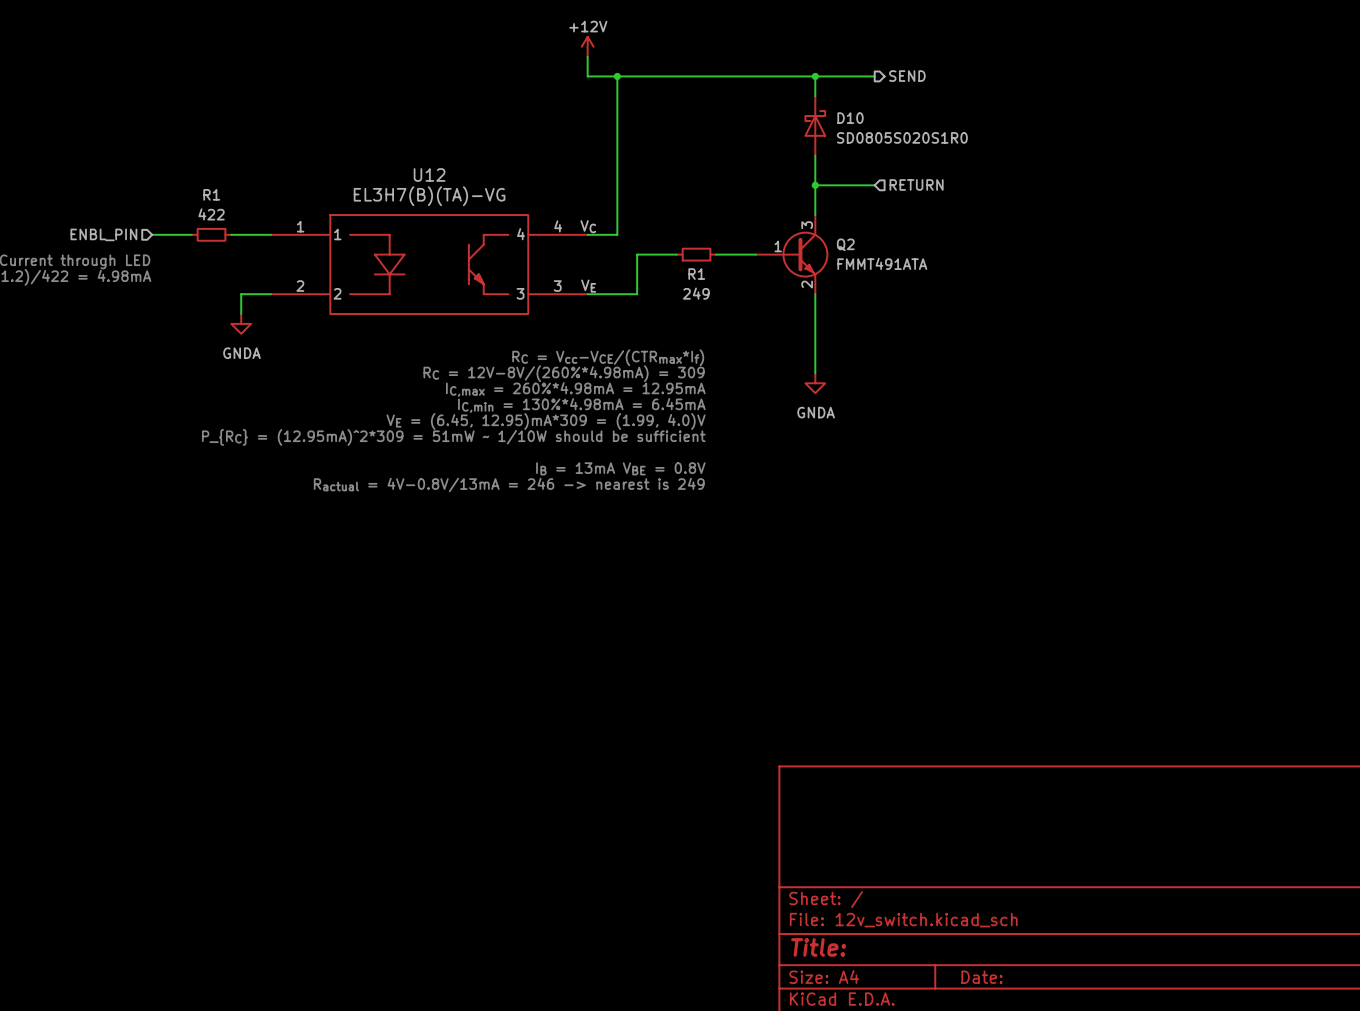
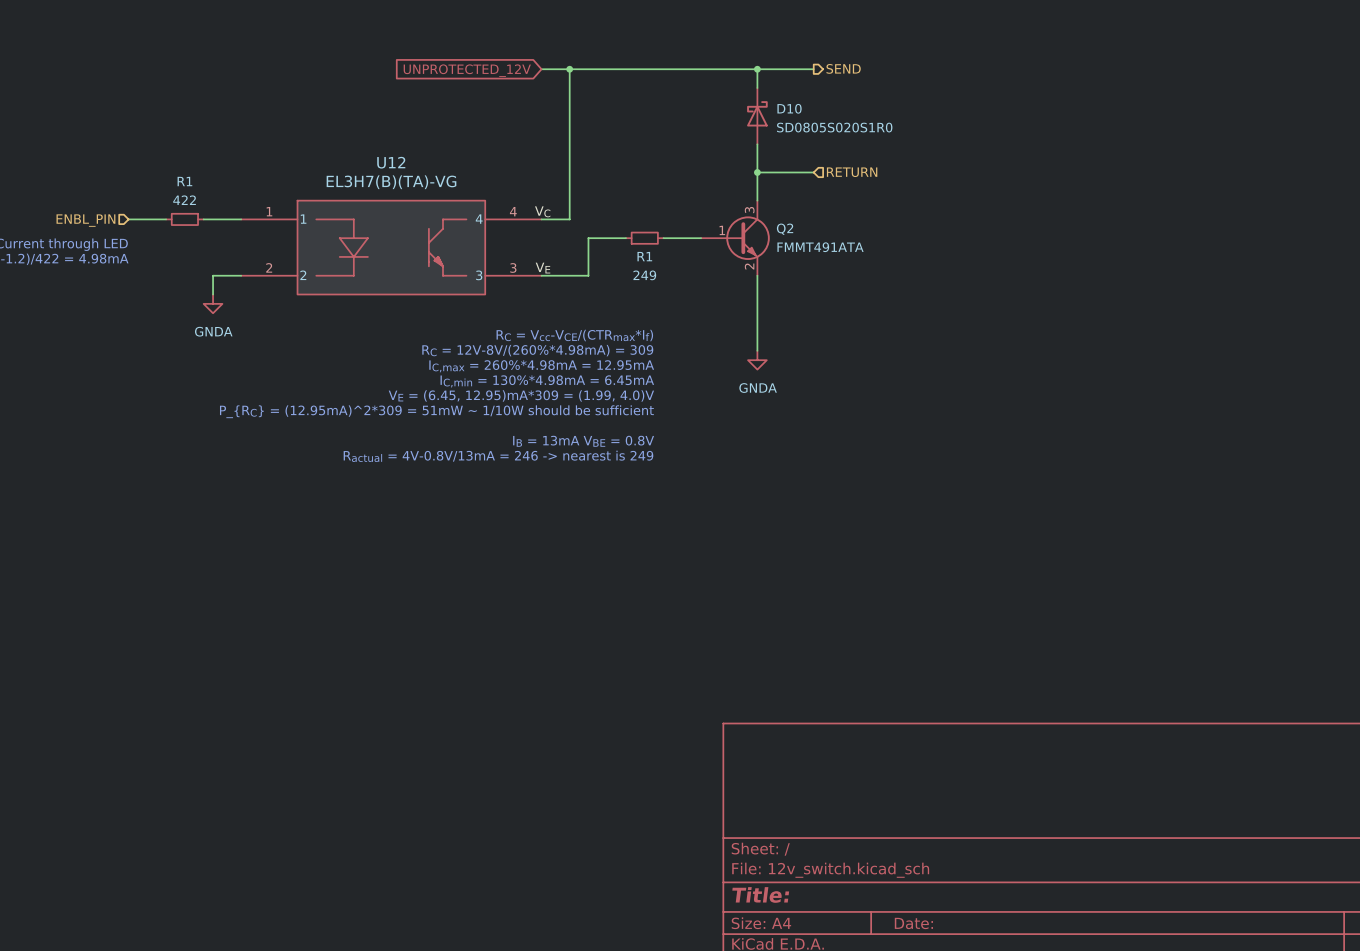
power symbol: +12V (587, 46) -> none
wire: (587, 56) (587, 76) -> none
global label: none -> UNPROTECTED_12V (467, 70)

